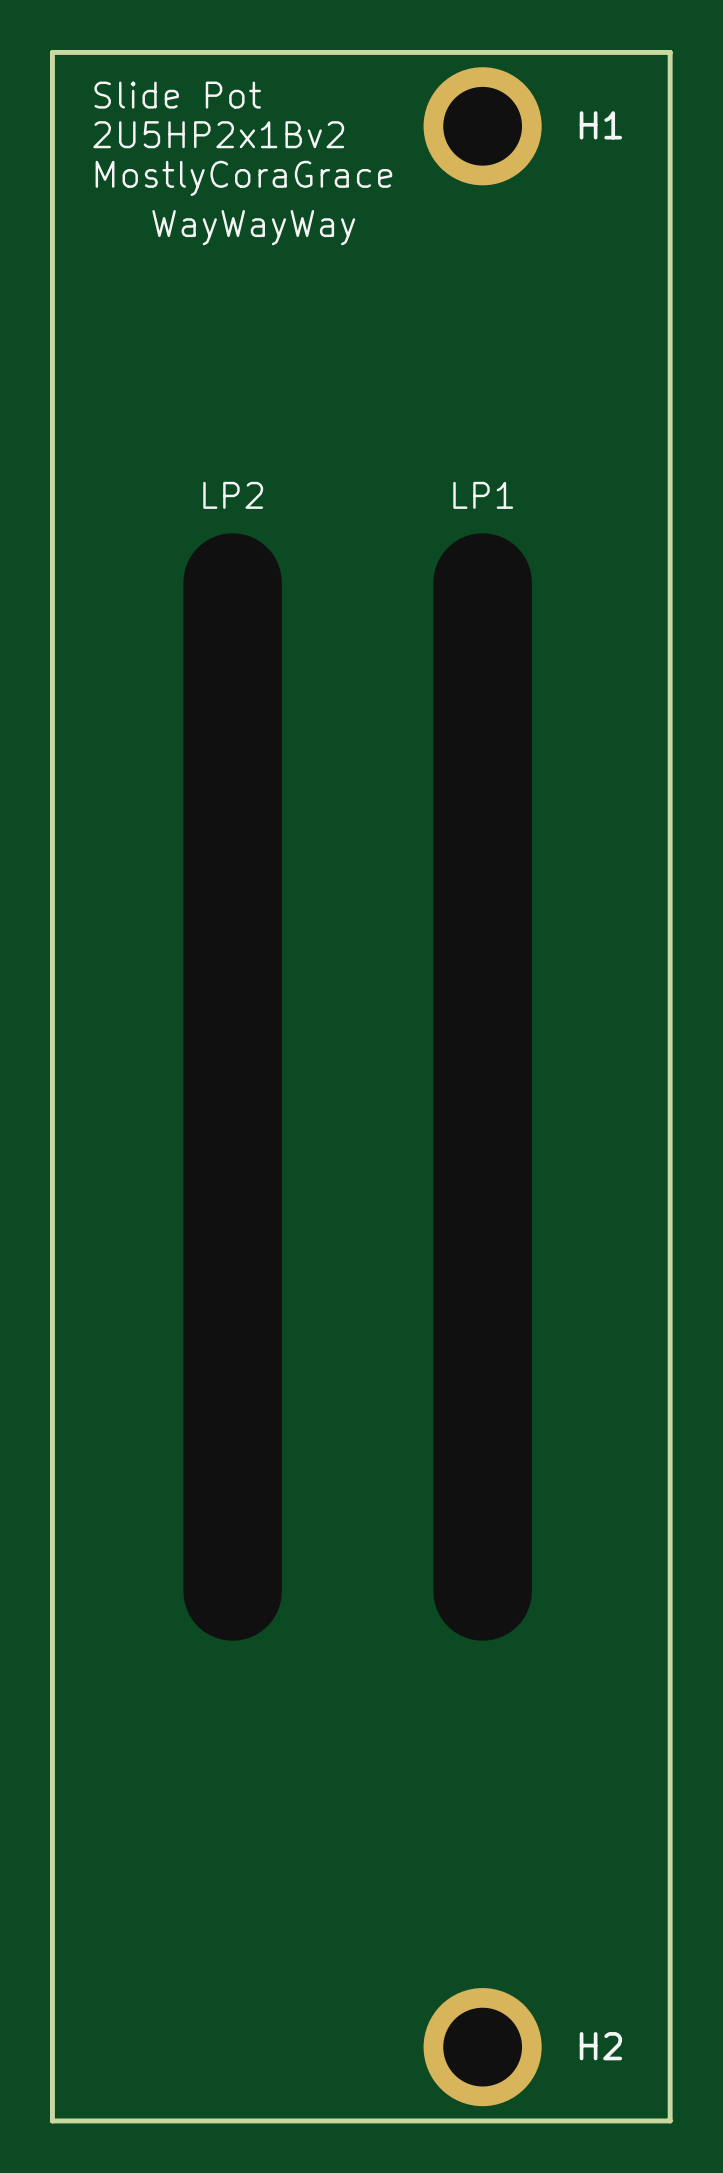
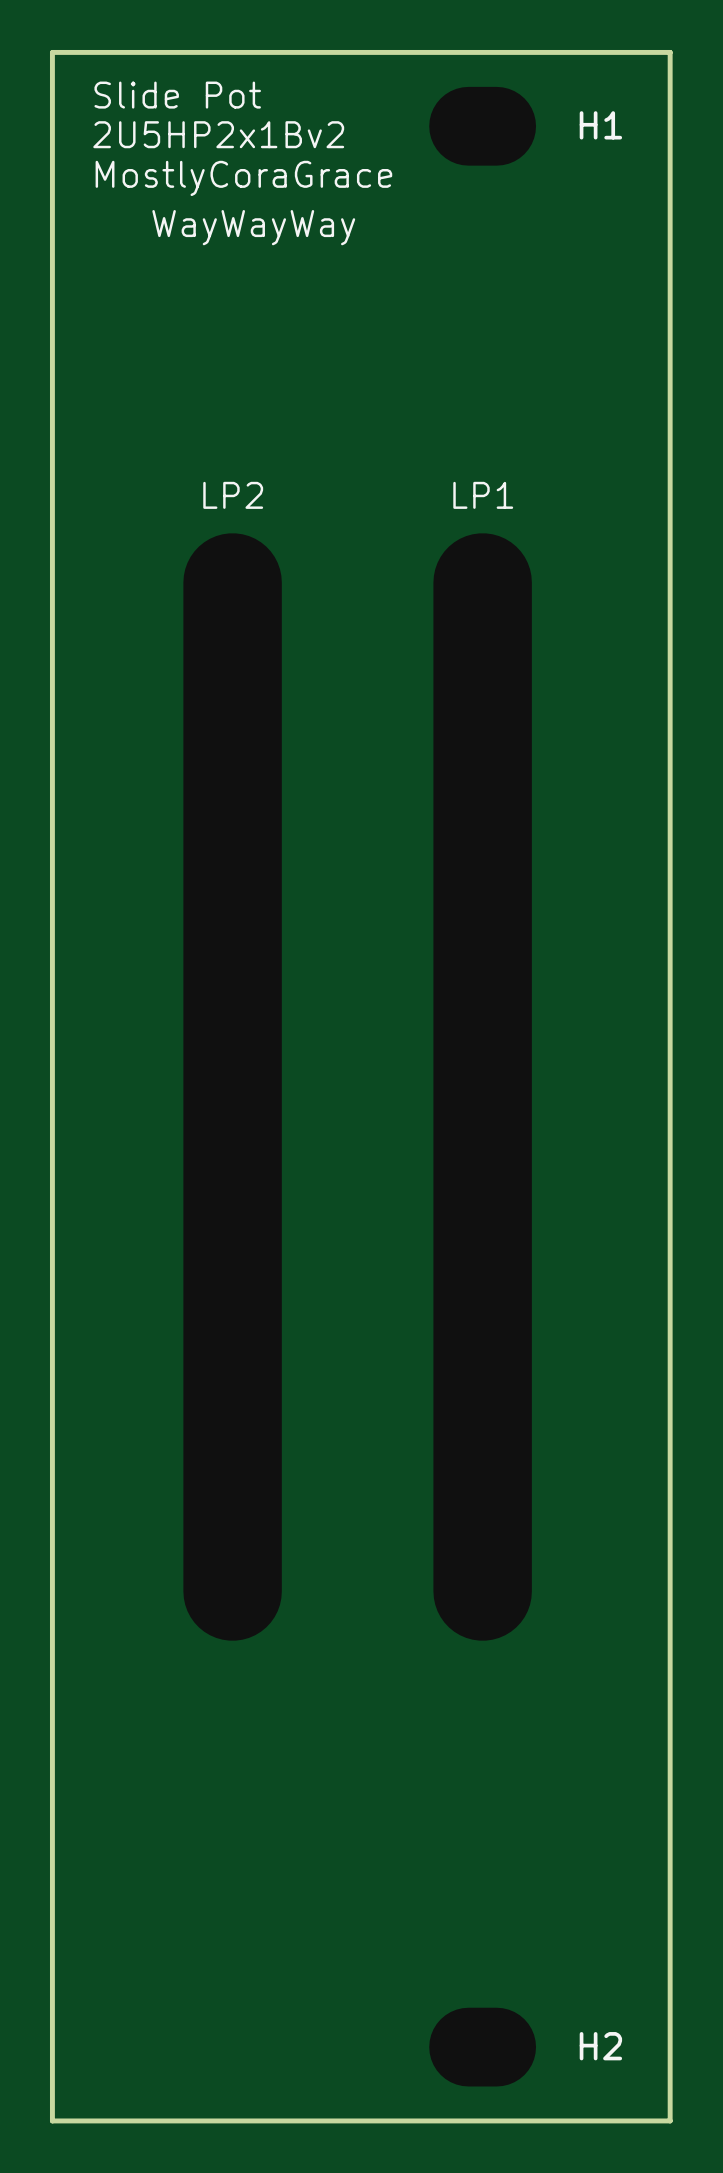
H1 footprint: [423, 67, 542, 186] -> [429, 86, 537, 166]
H2 footprint: [423, 1988, 542, 2107] -> [429, 2007, 537, 2087]

